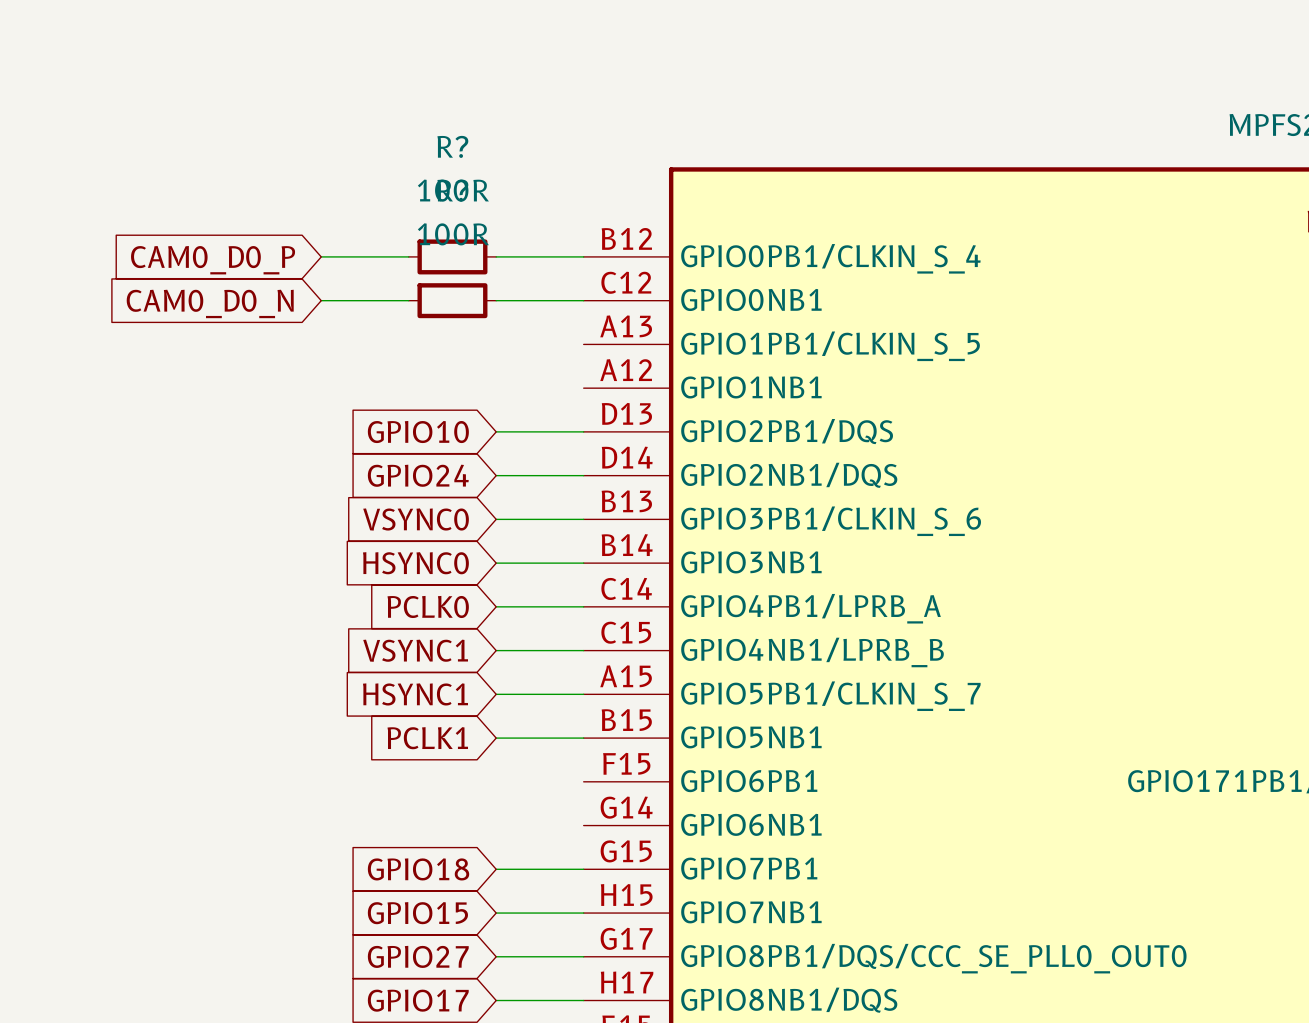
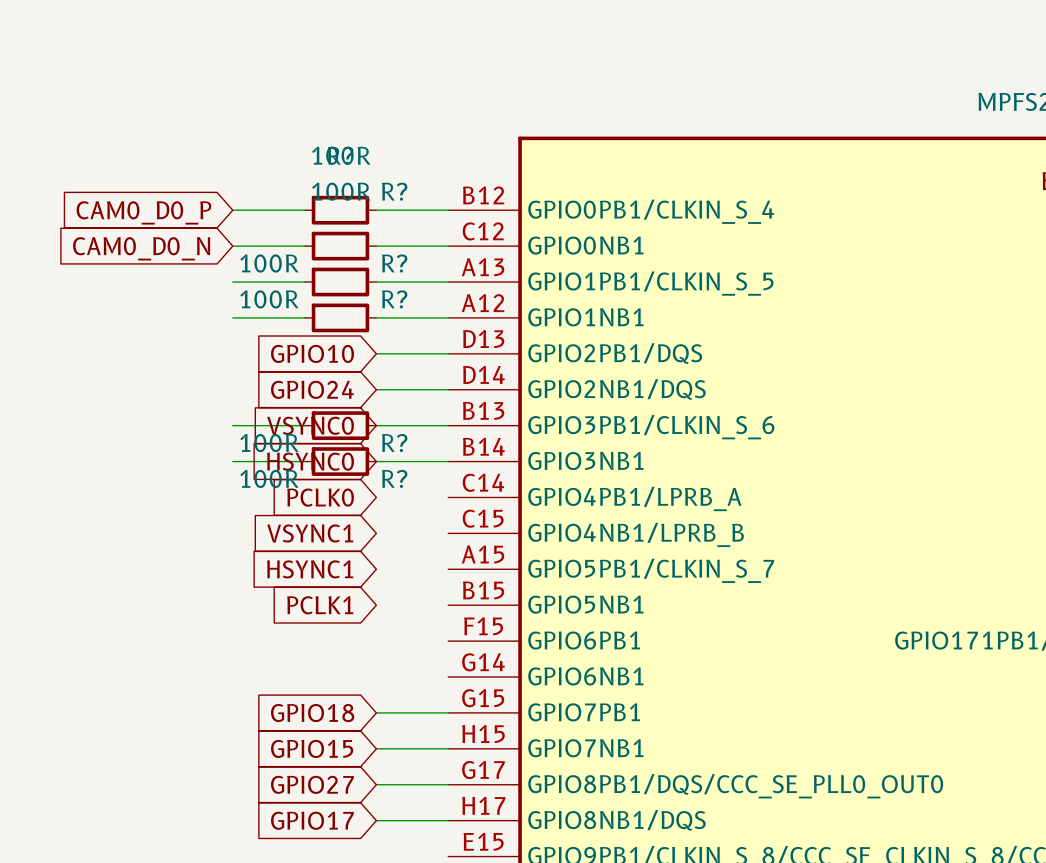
R? name position: R? (452, 146) -> R? (394, 191)
wire: none -> (232, 282) (304, 282)
R?: none -> (340, 282)
wire: none -> (376, 282) (448, 282)
R?: none -> (340, 317)
R?: none -> (340, 425)
R?: none -> (340, 461)
wire: (496, 606) (583, 606) -> (232, 425) (304, 425)
wire: (496, 650) (583, 650) -> (232, 461) (304, 461)
wire: (496, 694) (583, 694) -> (376, 317) (448, 317)
wire: (496, 738) (583, 738) -> (232, 317) (304, 317)

